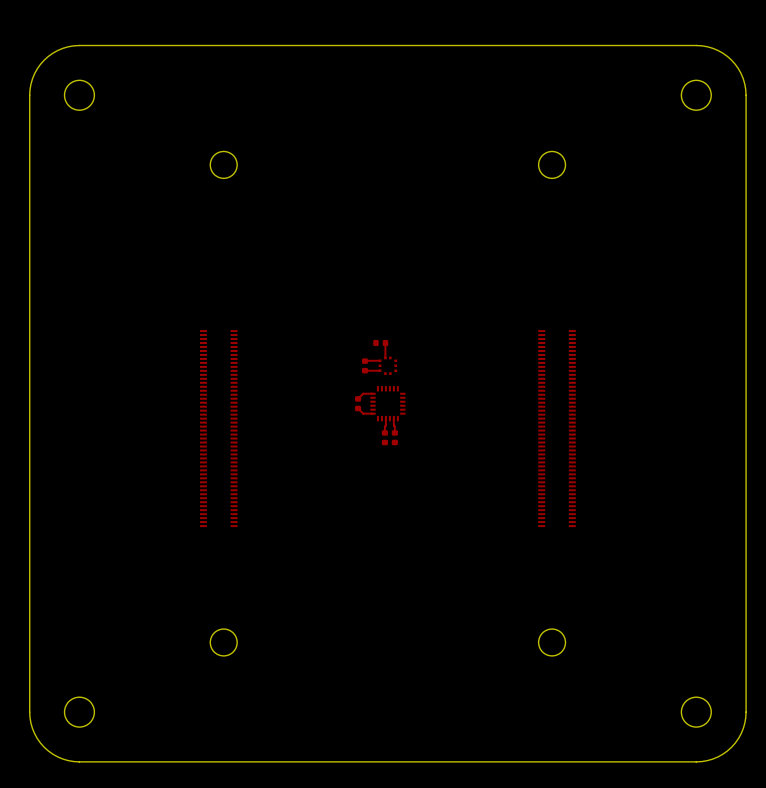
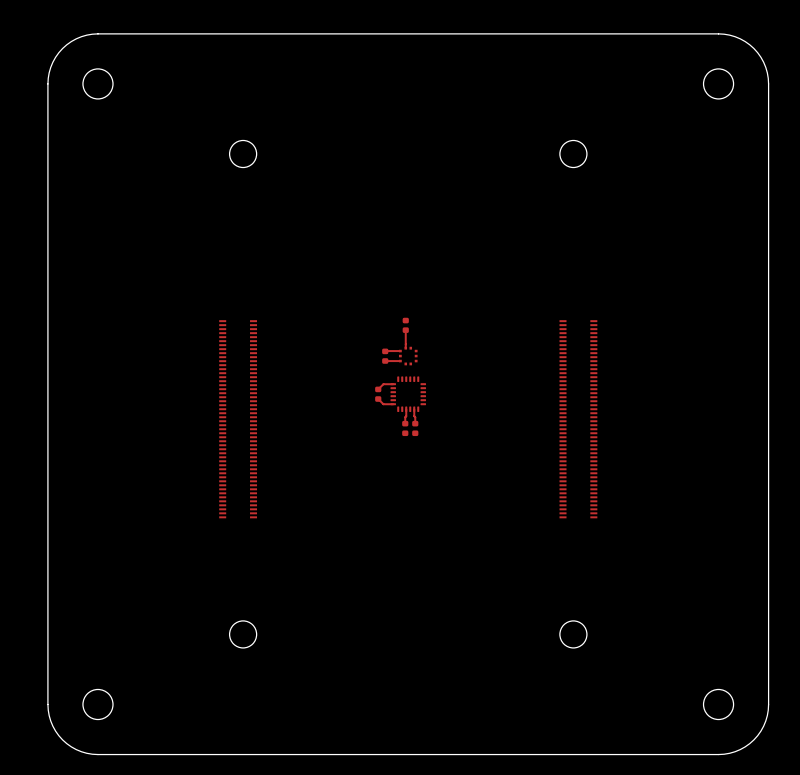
part rotation: 0° (380, 343) -> 90° clockwise (405, 325)

